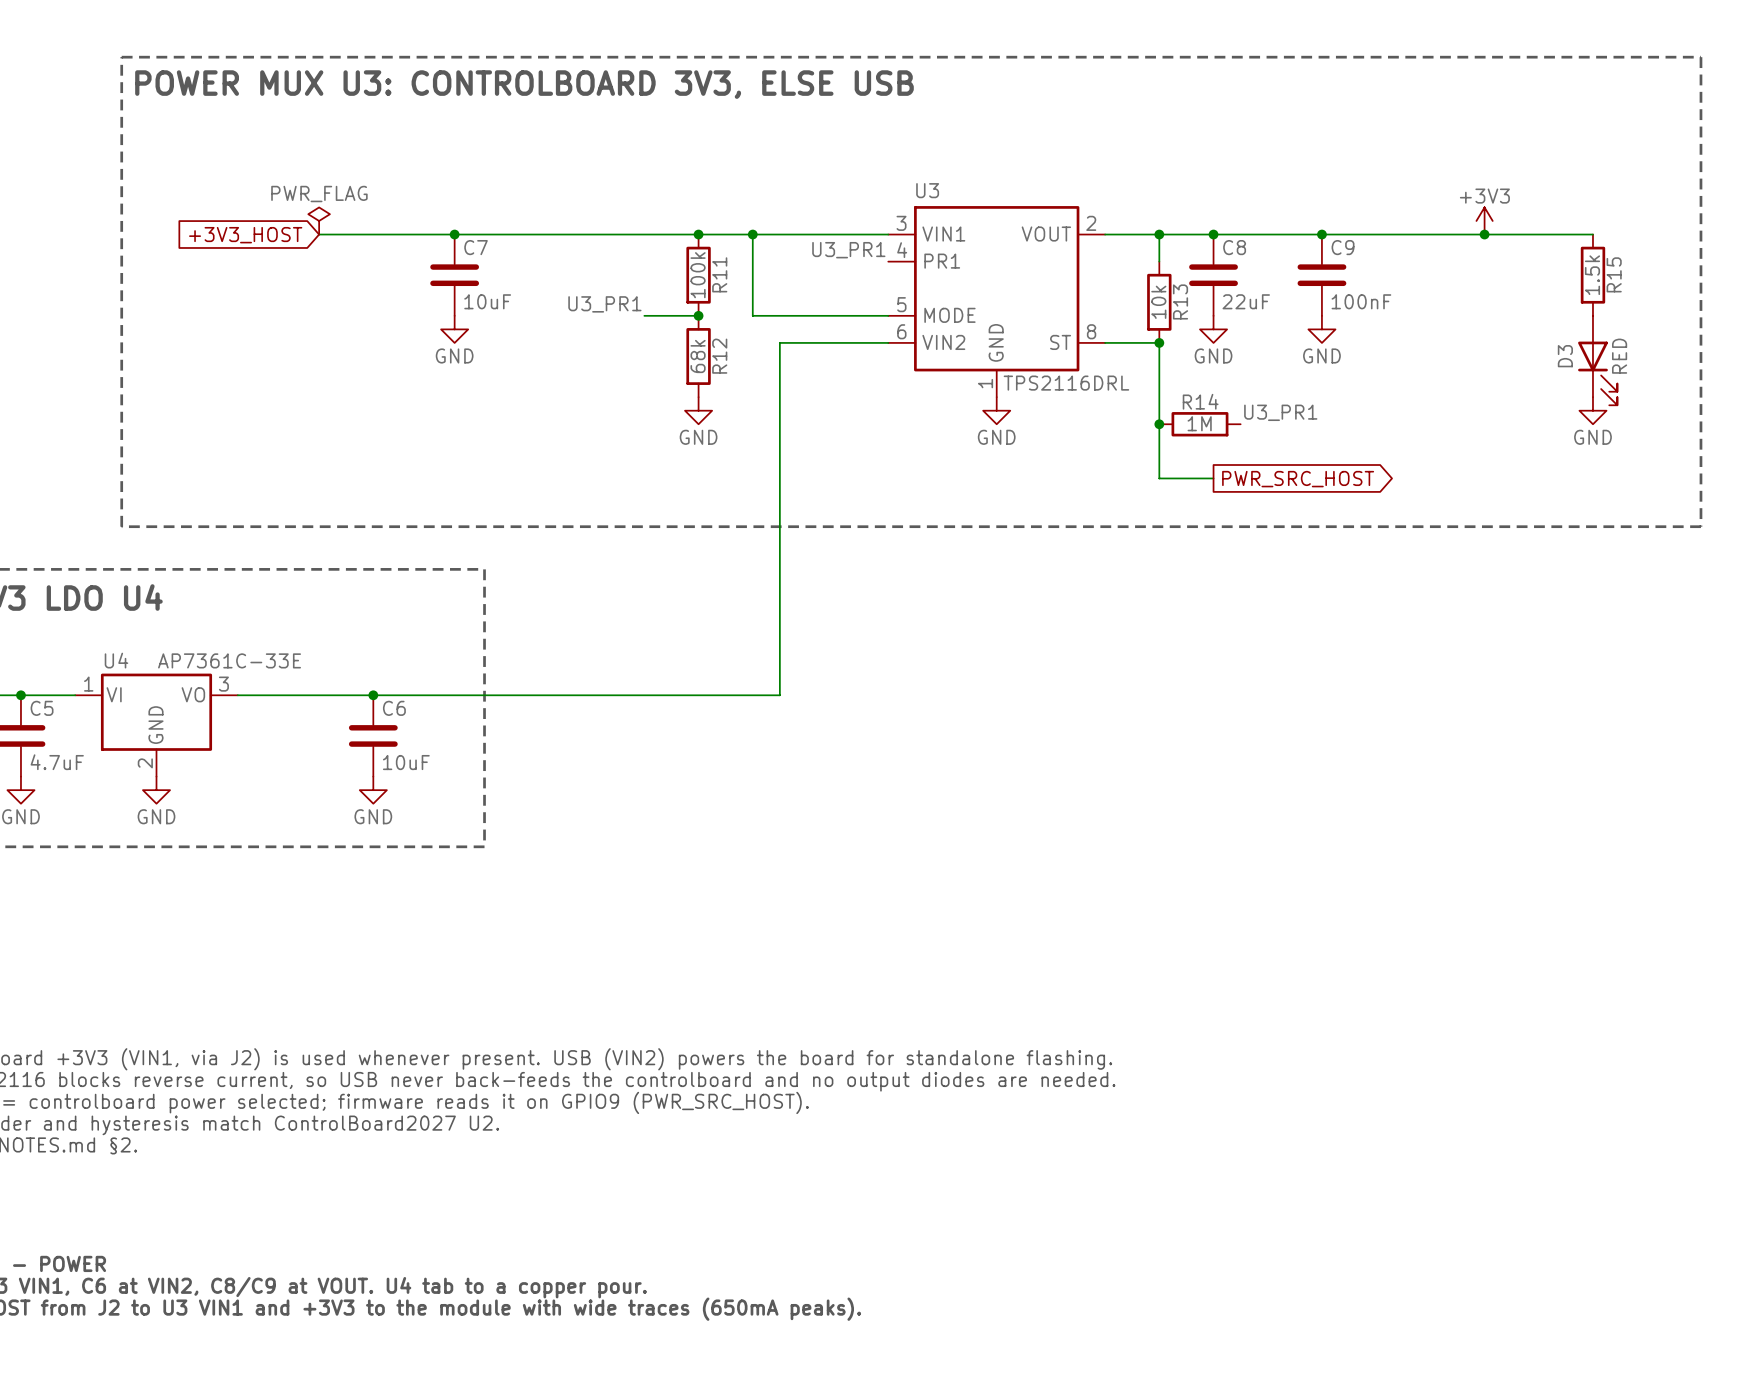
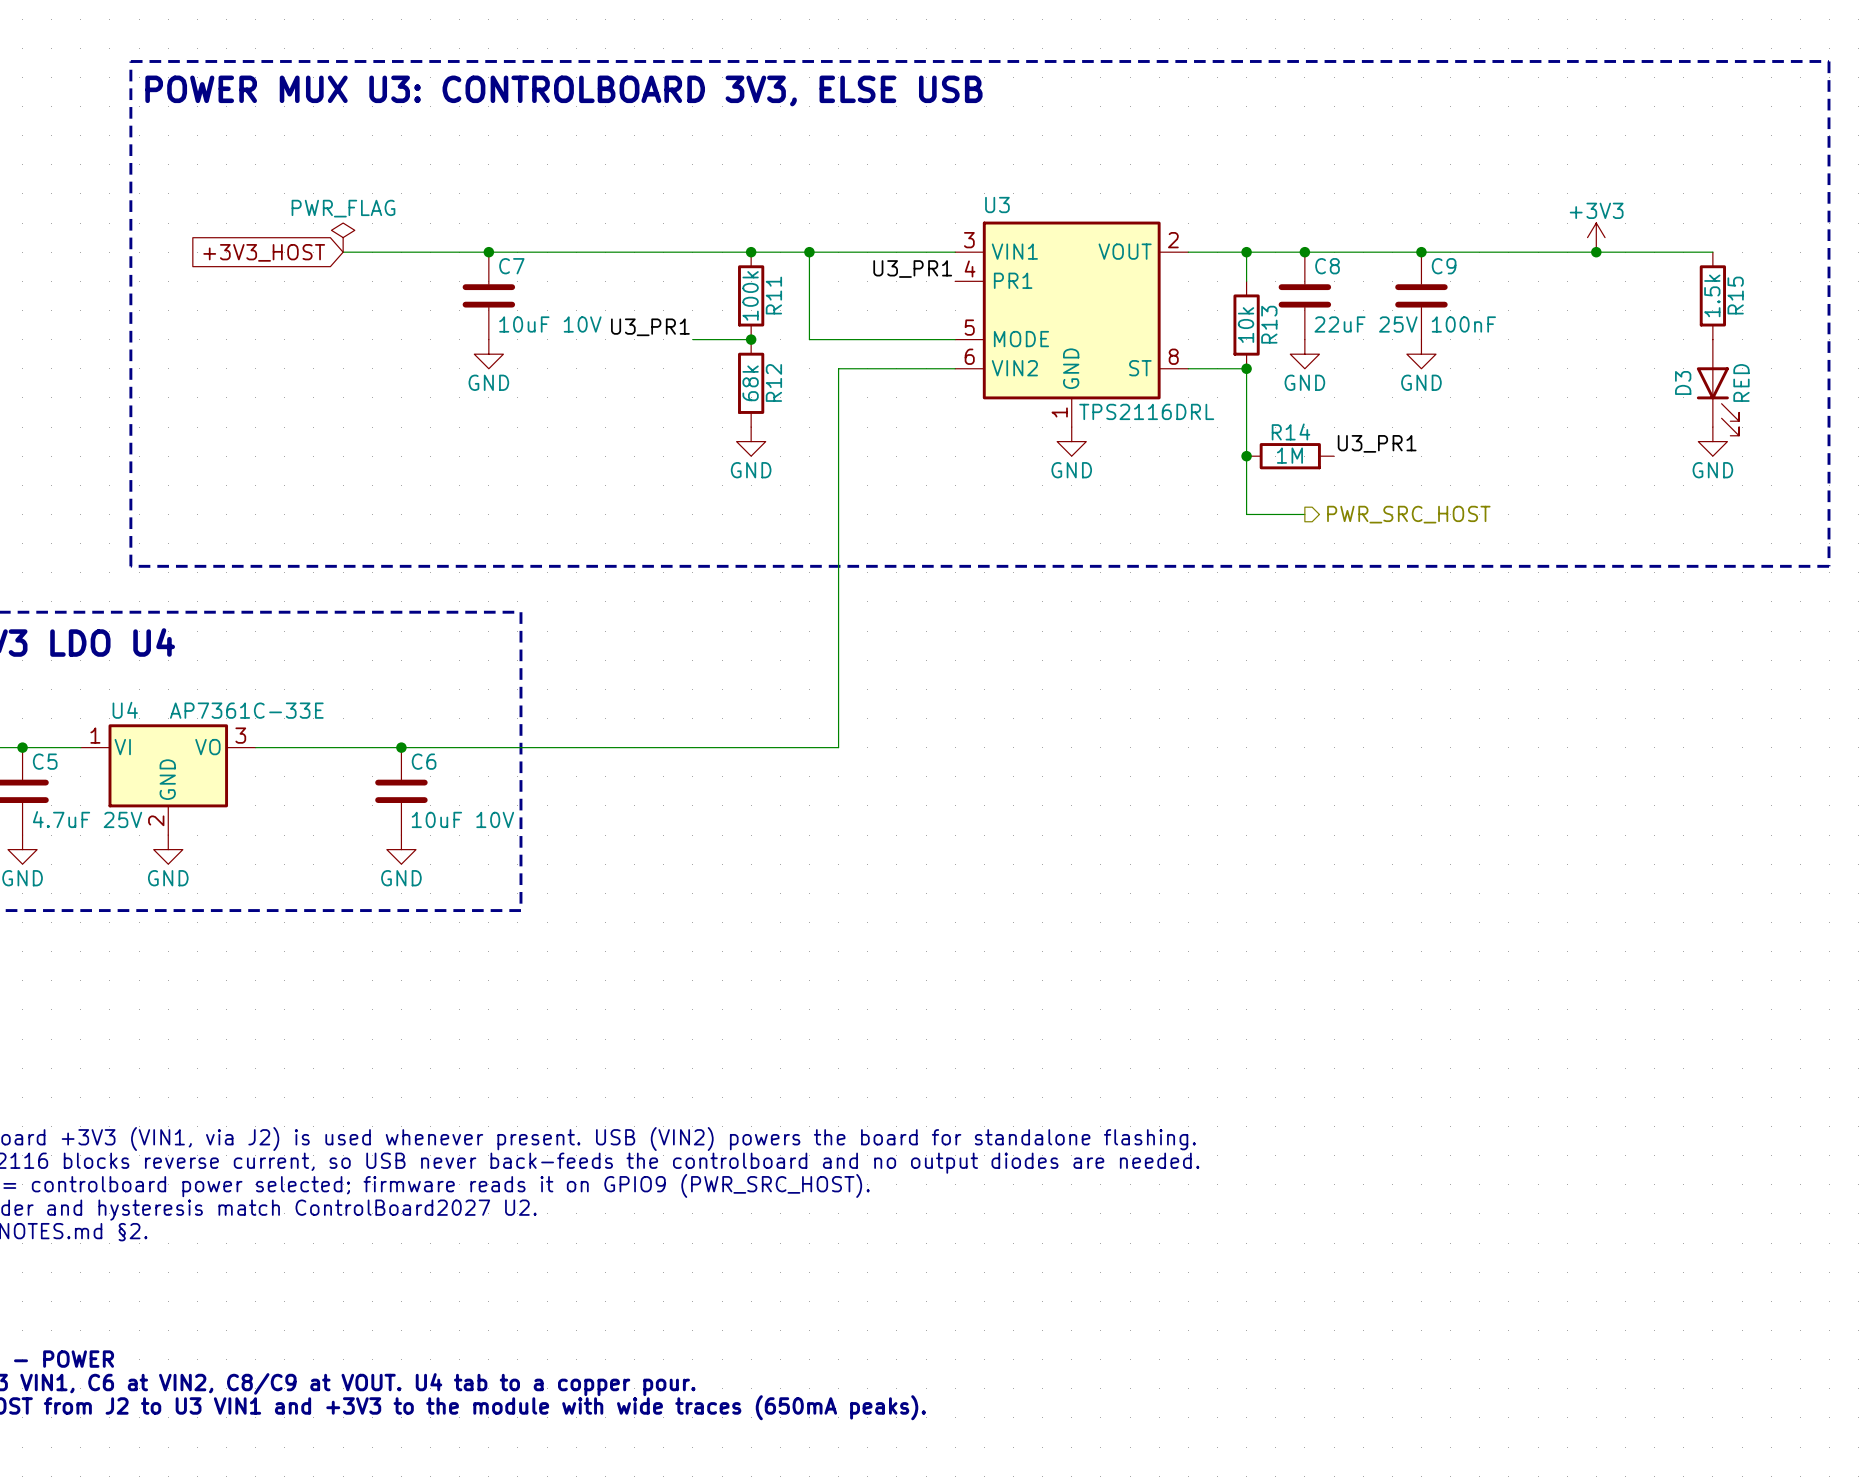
C7 value: 10uF (487, 301) -> 10uF 10V (550, 324)
C8 value: 22uF (1246, 301) -> 22uF 25V (1366, 324)
hierarchical label: none -> PWR_SRC_HOST (1408, 514)
global label: PWR_SRC_HOST (1298, 479) -> none
C5 value: 4.7uF (57, 762) -> 4.7uF 25V (87, 819)
C6 value: 10uF (406, 762) -> 10uF 10V (462, 819)

